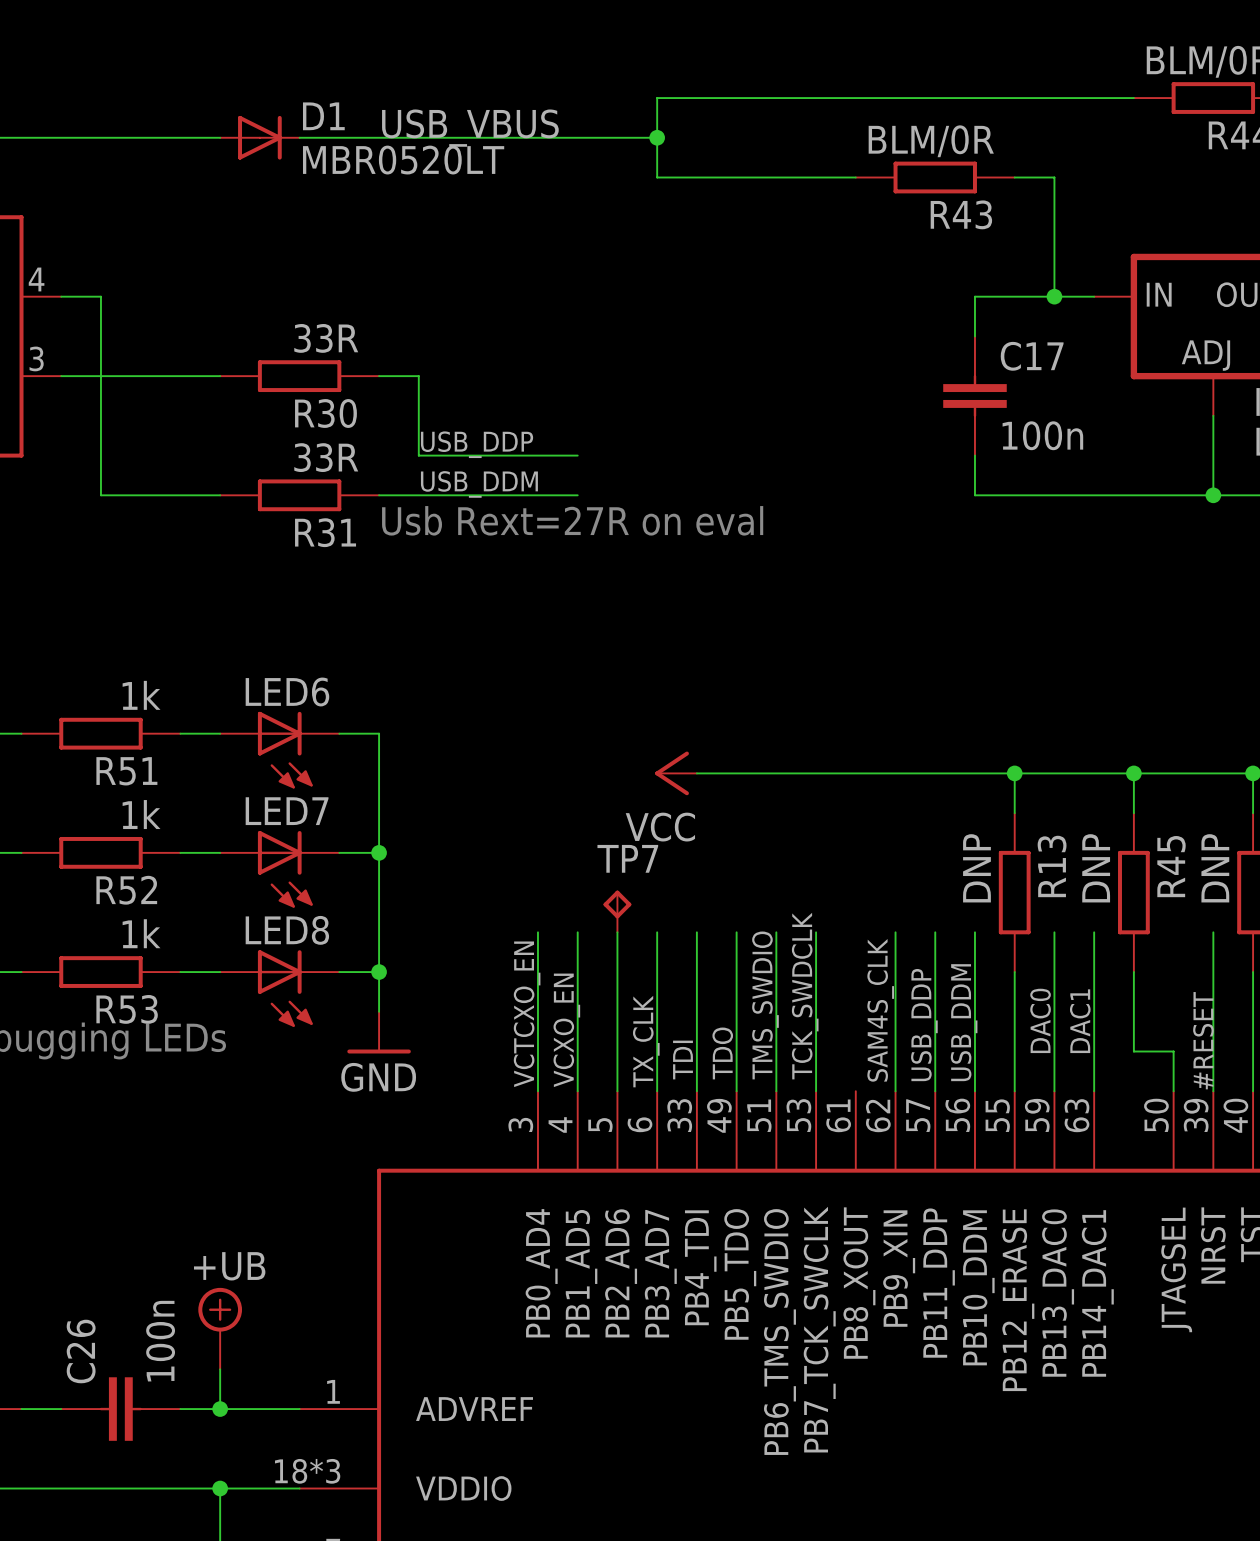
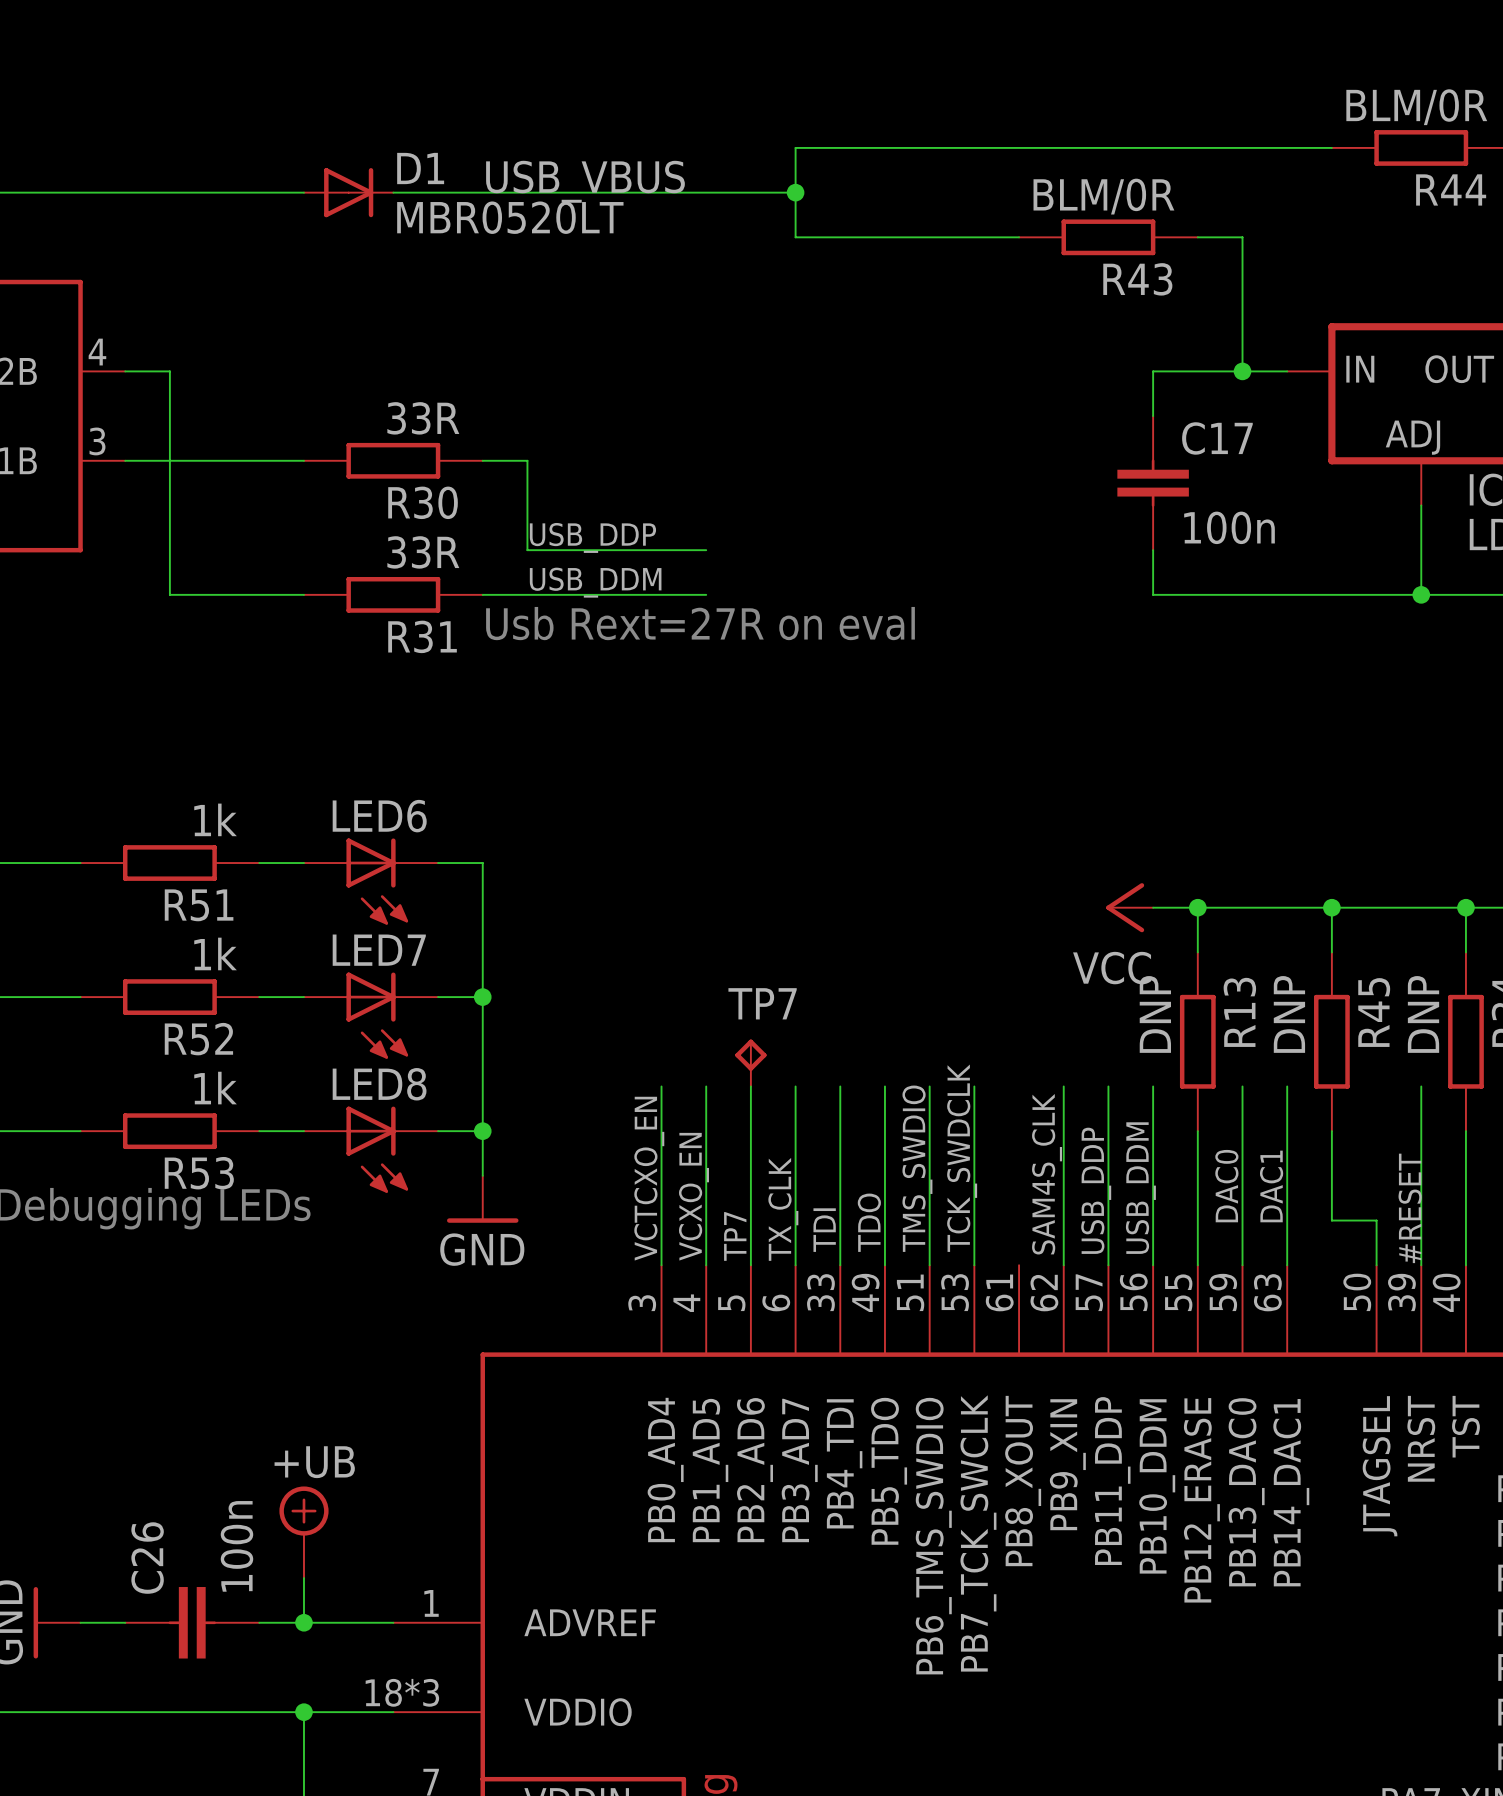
power symbol position: VCC (676, 773) -> VCC (1129, 907)
wire: (696, 773) (974, 773) -> none
label: none -> TP7 (735, 1236)

